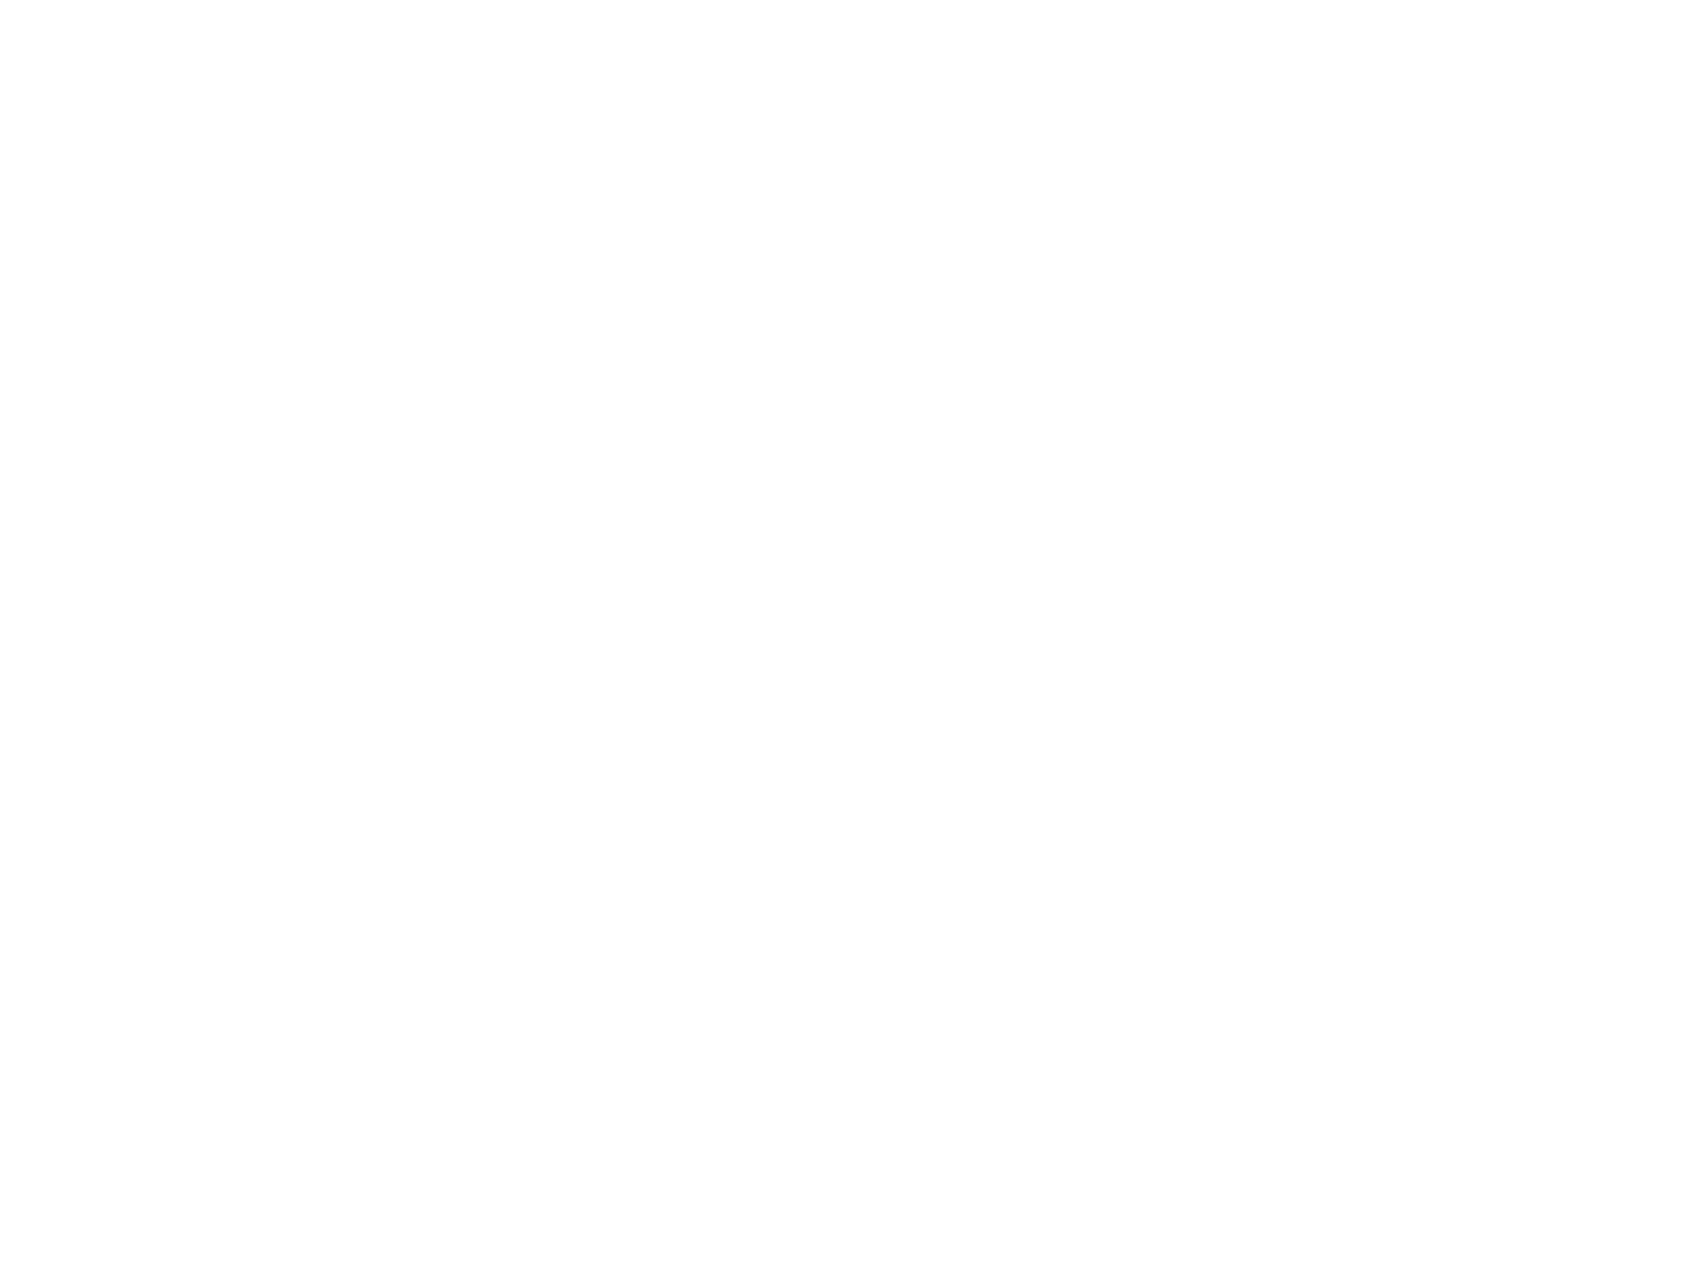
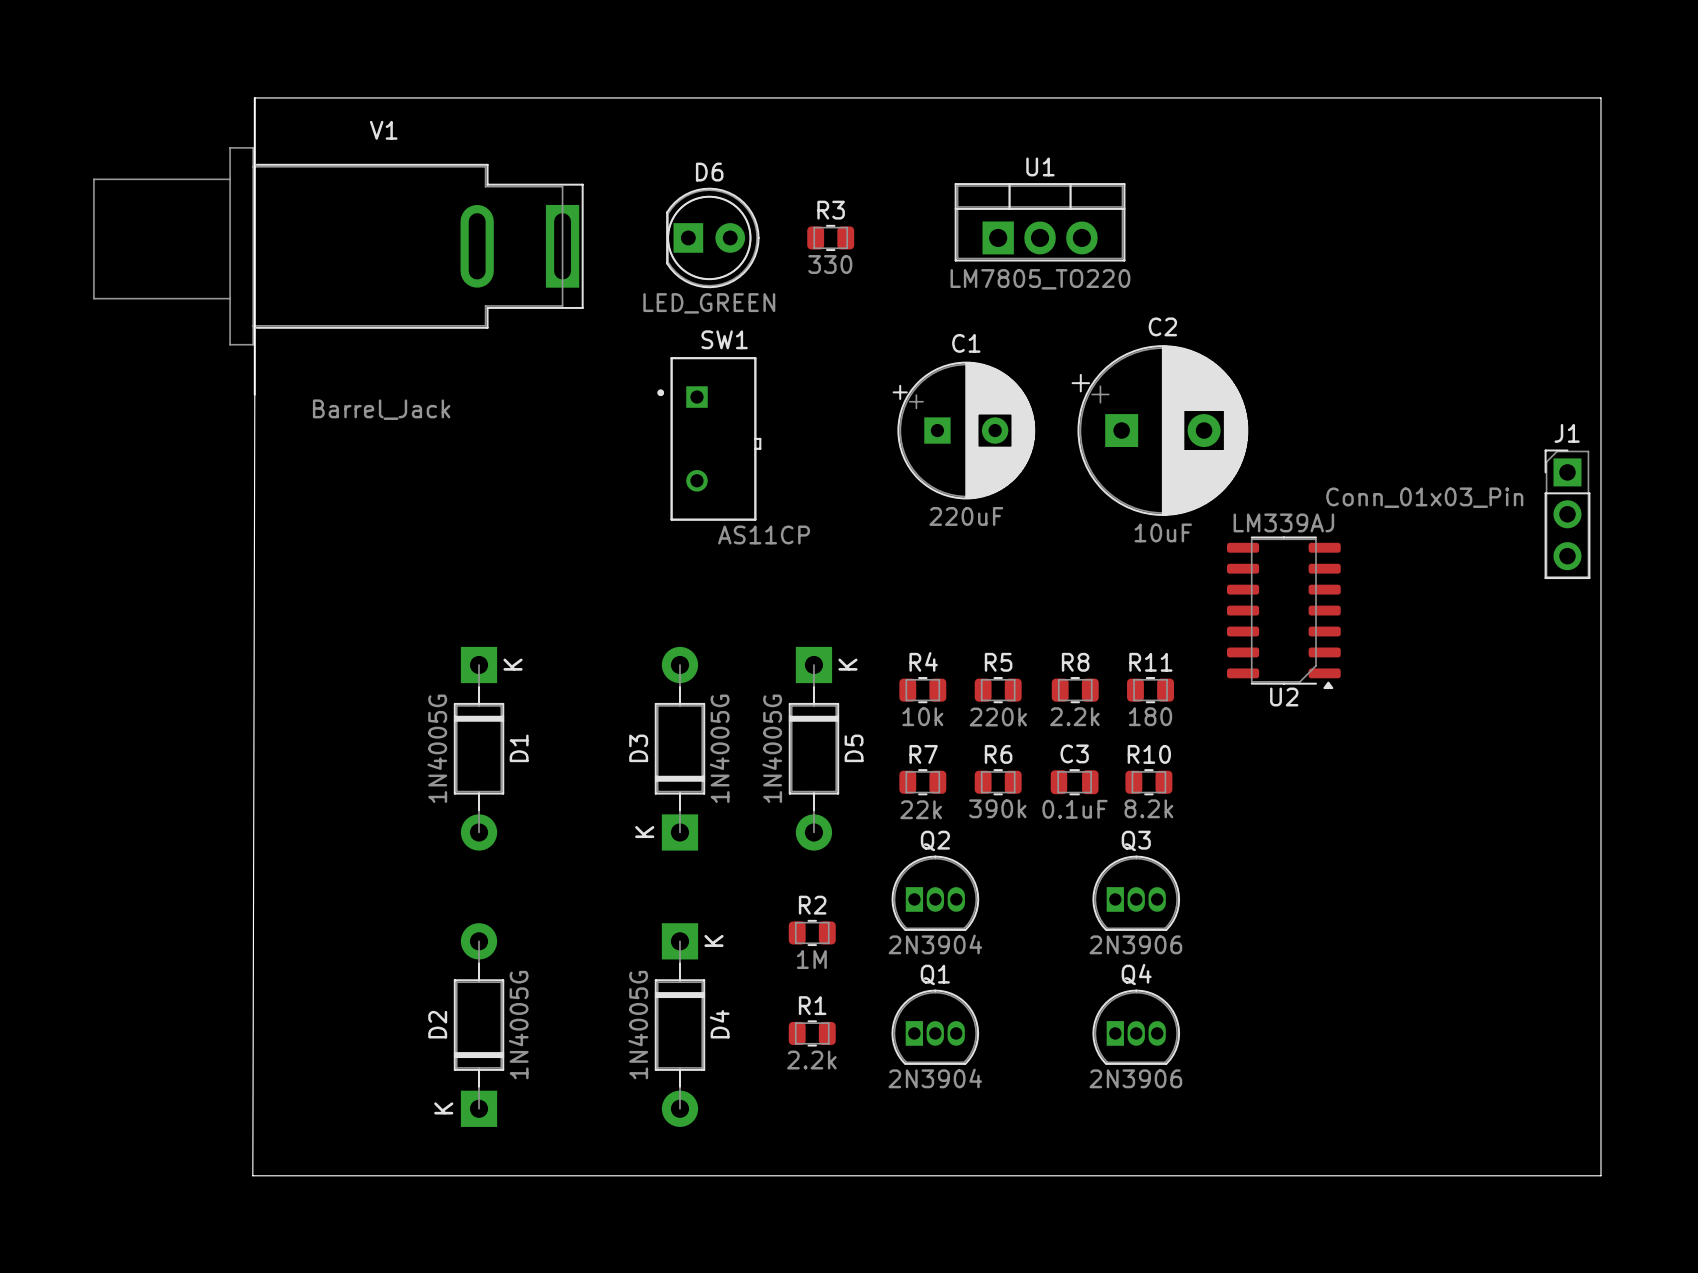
board edge: none -> (254, 97) (1600, 97) (1600, 1175) (252, 1175) (254, 394)
U1: none -> LM7805_TO220 (1040, 222)
D6: none -> LED_GREEN (712, 237)
R3: none -> 330 (830, 237)
V1: none -> Barrel_Jack (338, 246)
C1: none -> 220uF (963, 430)
C2: none -> 10uF (1159, 430)
SW1: none -> AS11CP (709, 438)
J1: none -> Conn_01x03_Pin (1567, 514)
U2: none -> LM339AJ (1283, 612)
R4: none -> 10k (922, 690)
R5: none -> 220k (998, 690)
R8: none -> 2.2k (1075, 690)
R11: none -> 180 (1150, 690)
D1: none -> 1N4005G (479, 748)
D3: none -> 1N4005G (679, 748)
D5: none -> 1N4005G (813, 748)
R7: none -> 22k (922, 782)
R6: none -> 390k (998, 782)
C3: none -> 0.1uF (1074, 782)
R10: none -> 8.2k (1148, 782)
Q2: none -> 2N3904 (935, 893)
Q3: none -> 2N3906 (1136, 893)
R2: none -> 1M (812, 932)
D2: none -> 1N4005G (479, 1025)
D4: none -> 1N4005G (679, 1025)
Q1: none -> 2N3904 (935, 1027)
Q4: none -> 2N3906 (1136, 1027)
R1: none -> 2.2k (812, 1033)

